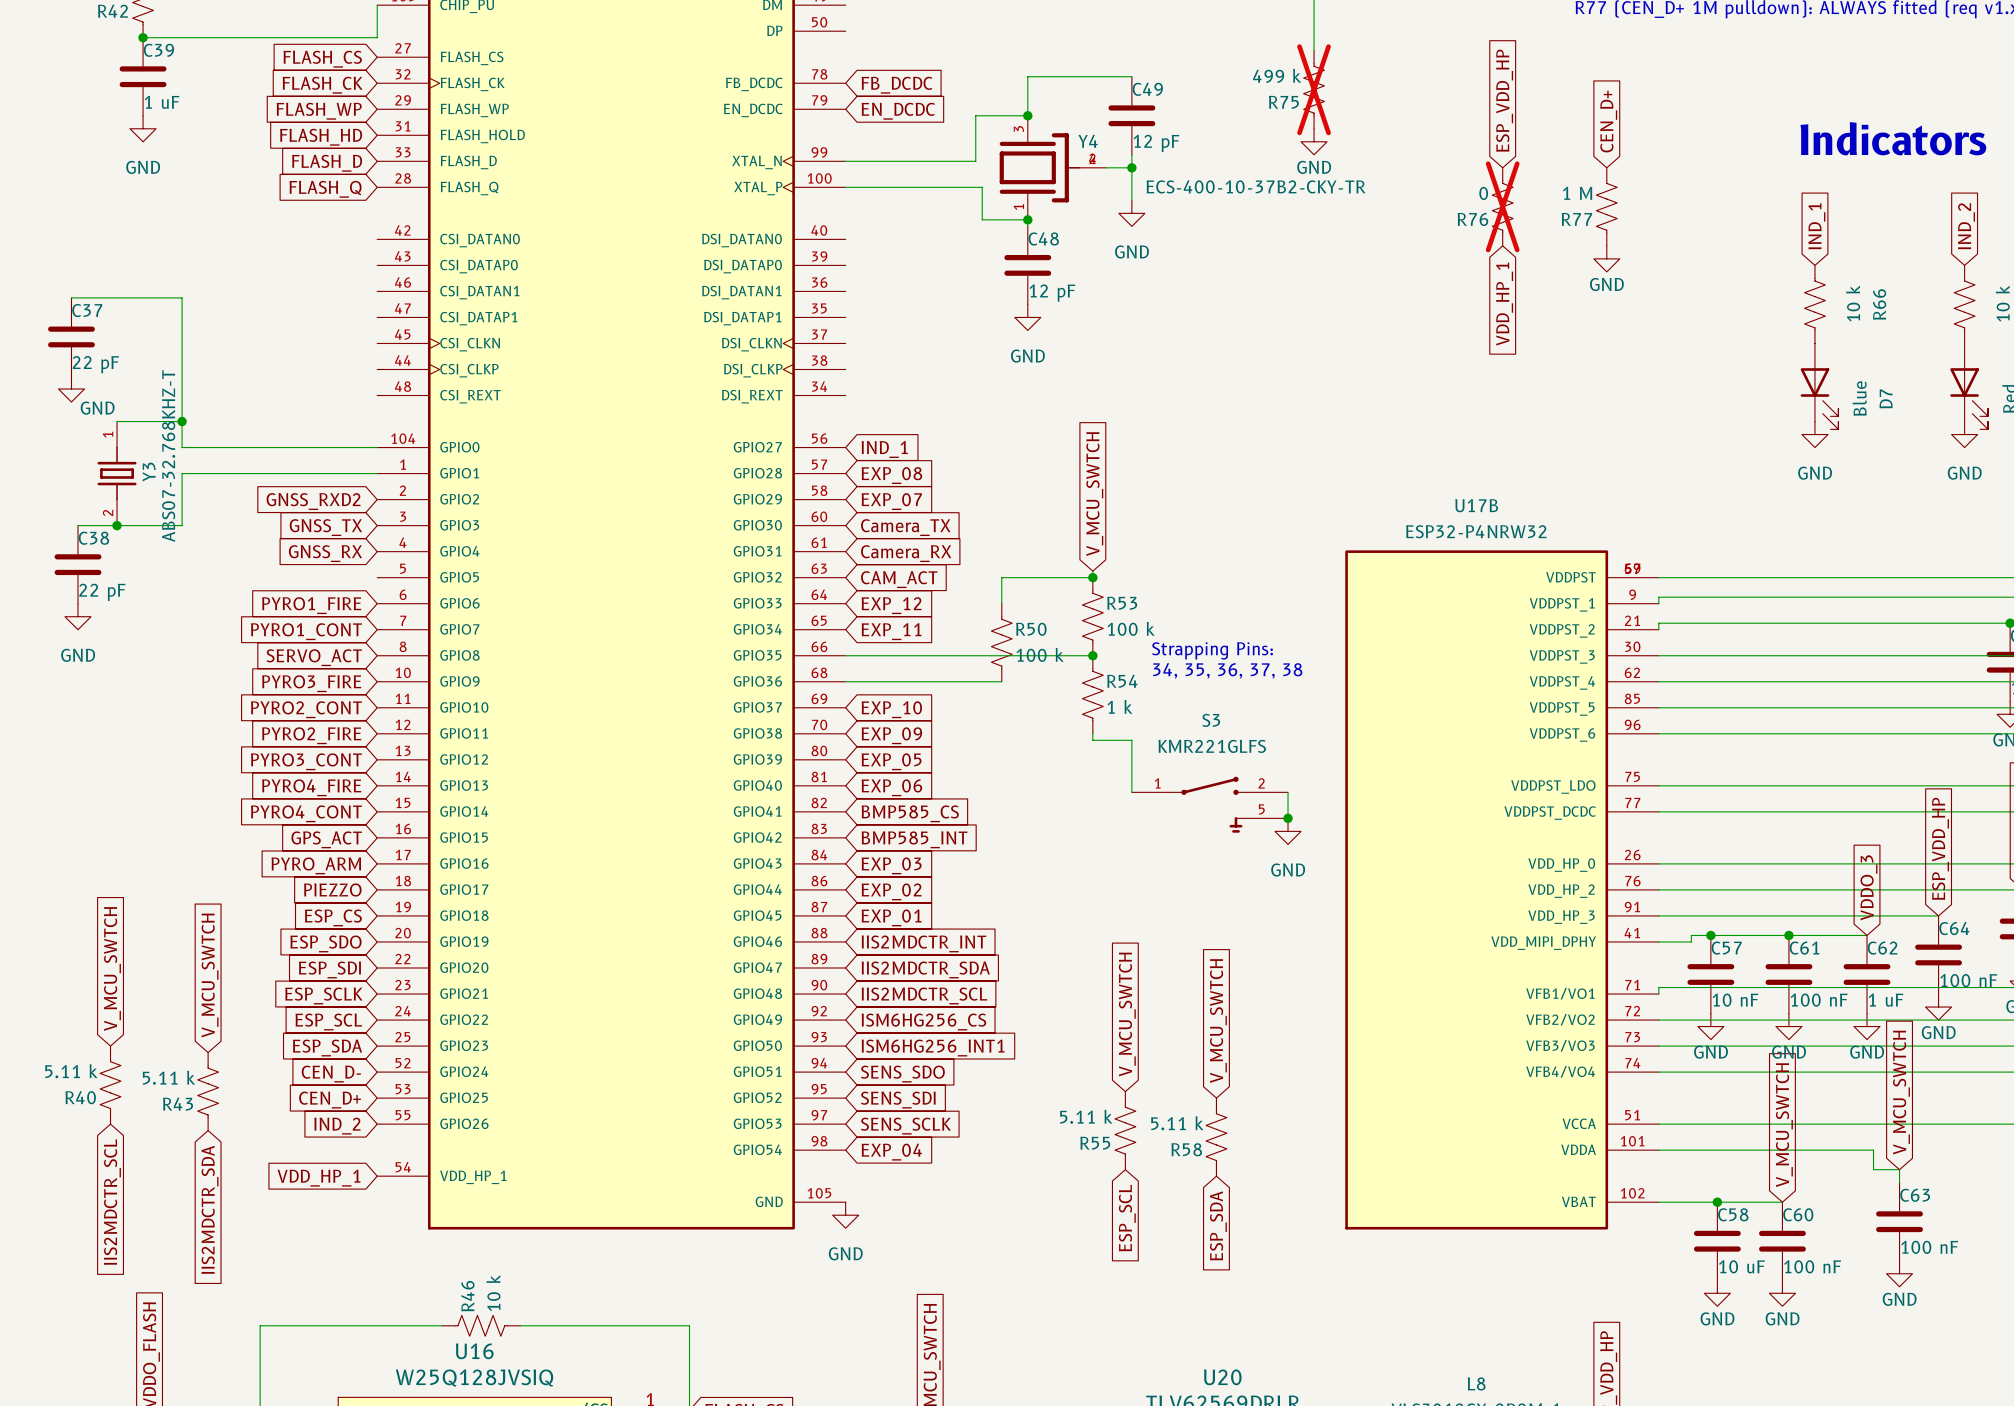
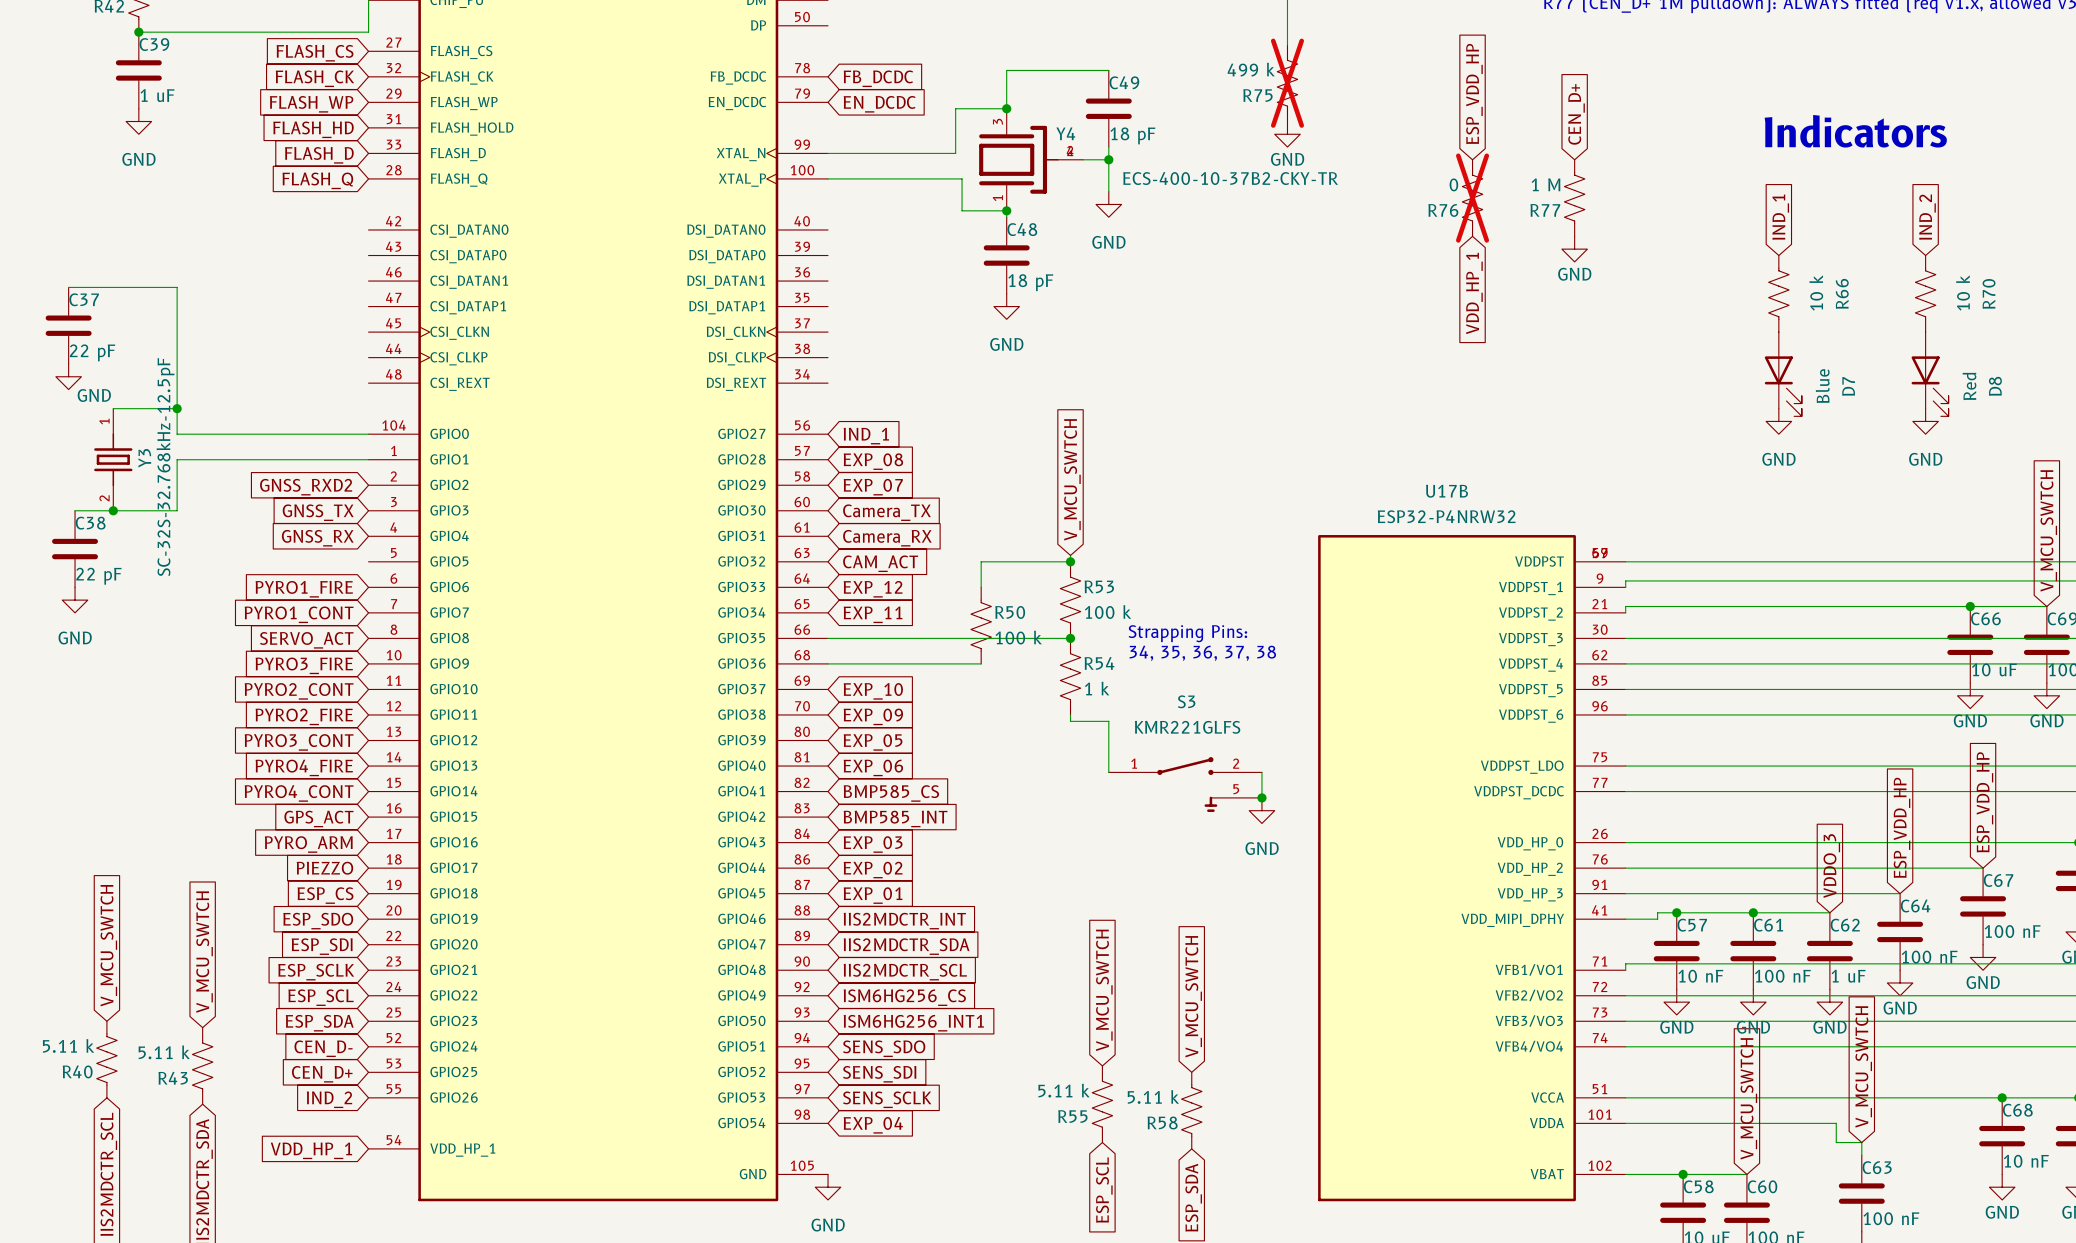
C49 value: 12 pF (1156, 143) -> 18 pF (1132, 135)
C48 value: 12 pF (1052, 293) -> 18 pF (1030, 282)
Y3 value: ABS07-32.768KHZ-T (168, 456) -> SC-32S-32.768kHz-12.5pF (165, 467)

